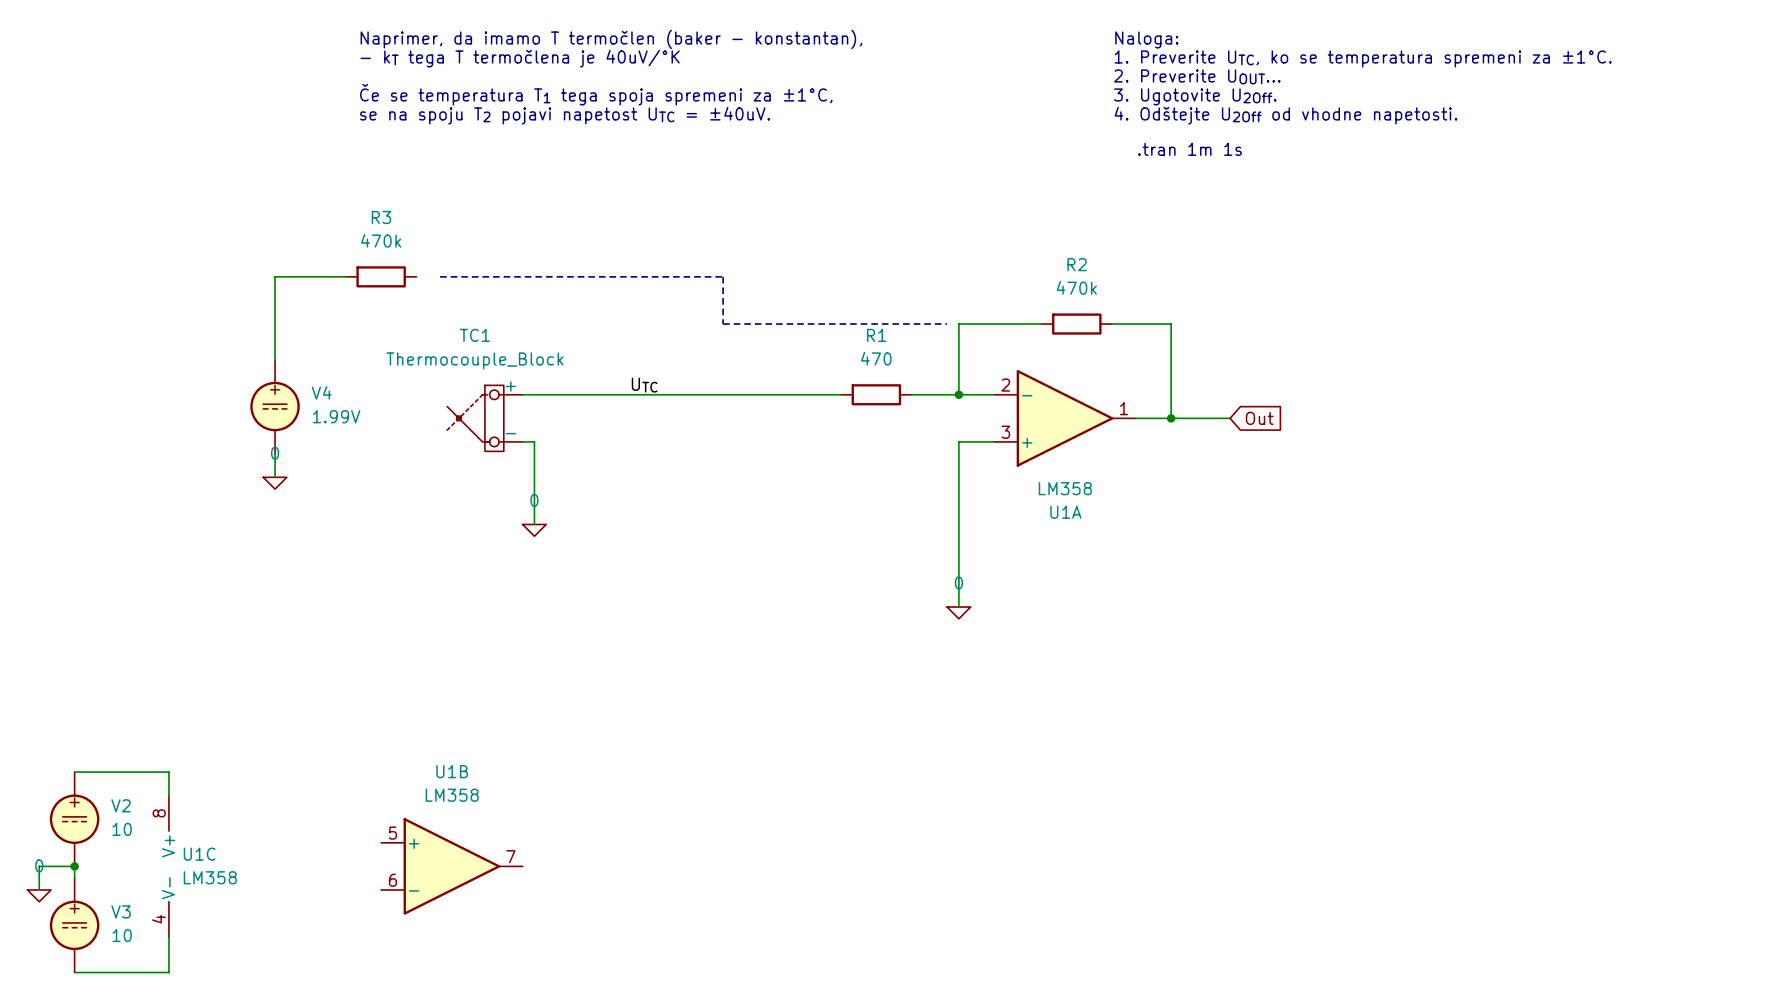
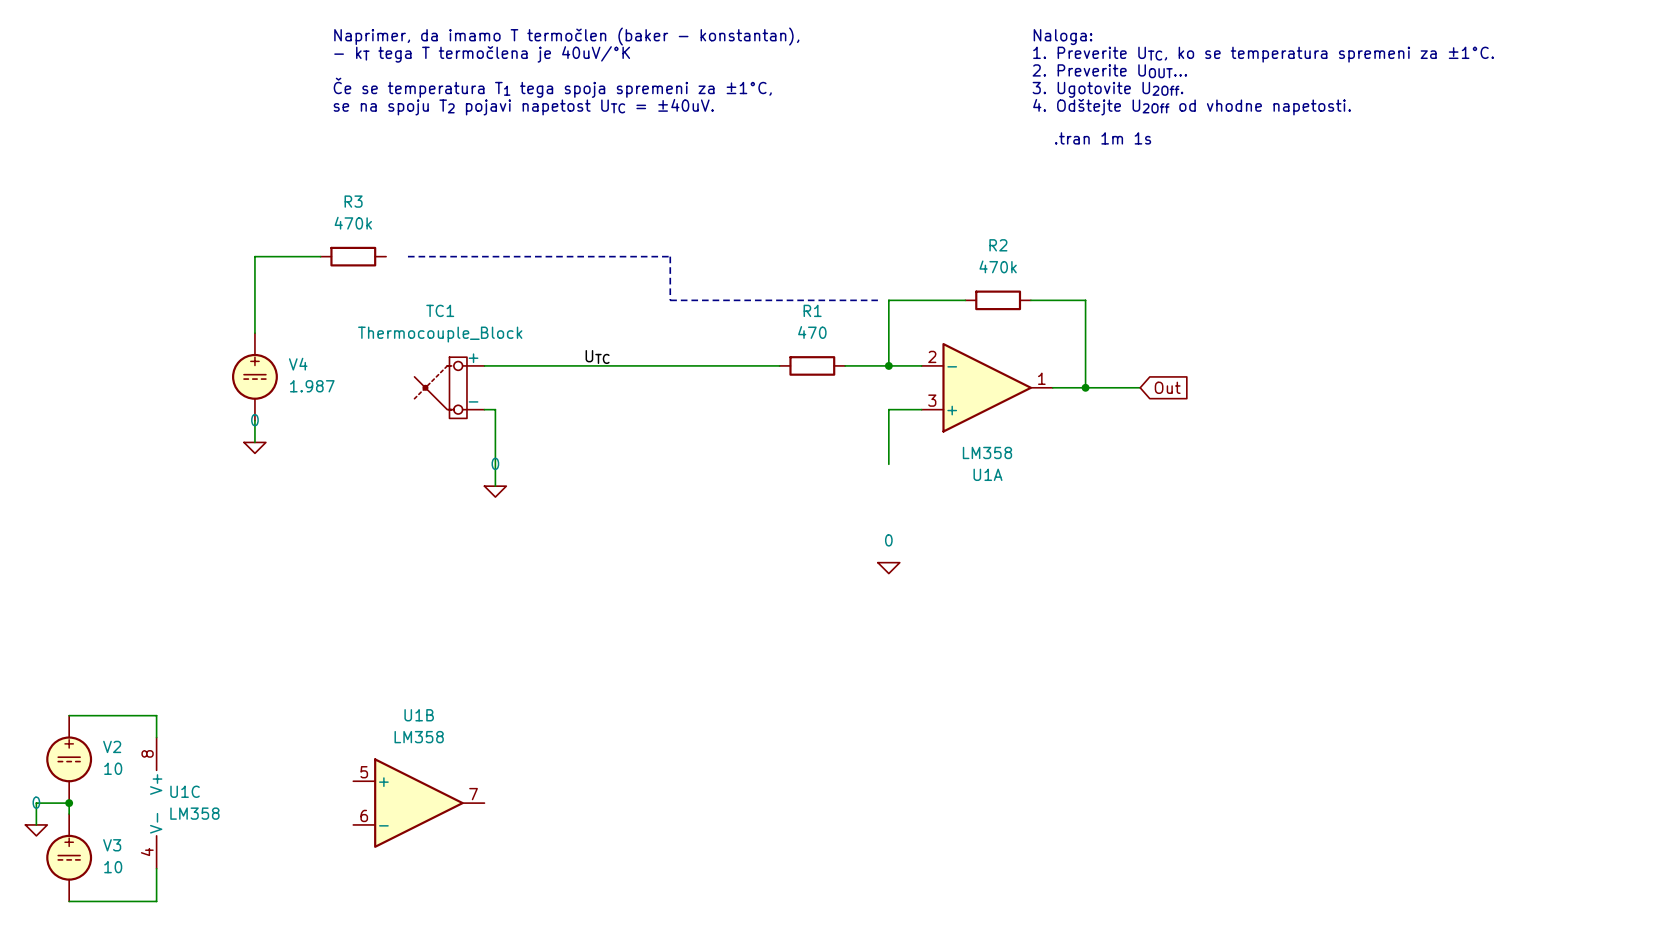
V4 value: 1.99V (336, 416) -> 1.987 (312, 386)
wire: (958, 500) (958, 607) -> none

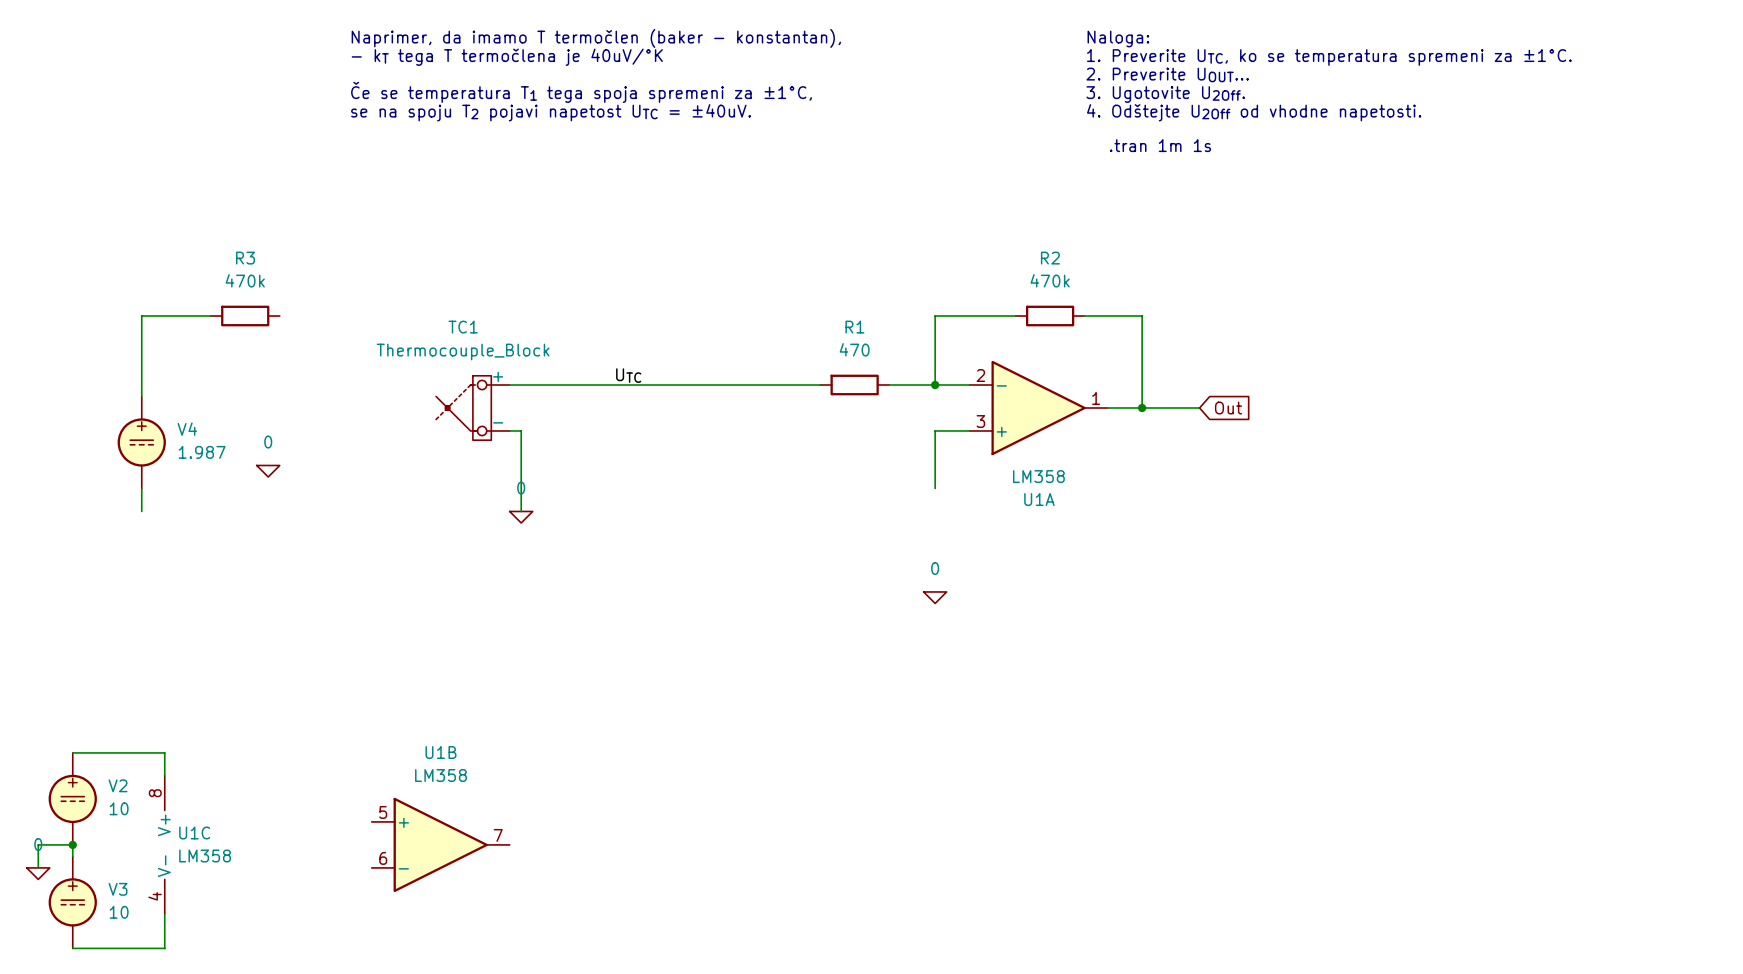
wire: (320, 256) (254, 256) (254, 333) -> (210, 316) (141, 316) (141, 396)
R3 position: (353, 256) -> (245, 316)
line: (407, 256) (670, 256) (670, 300) (877, 300) -> none
V4 position: (254, 376) -> (141, 442)
wire: (254, 420) (254, 442) -> (141, 488) (141, 511)

